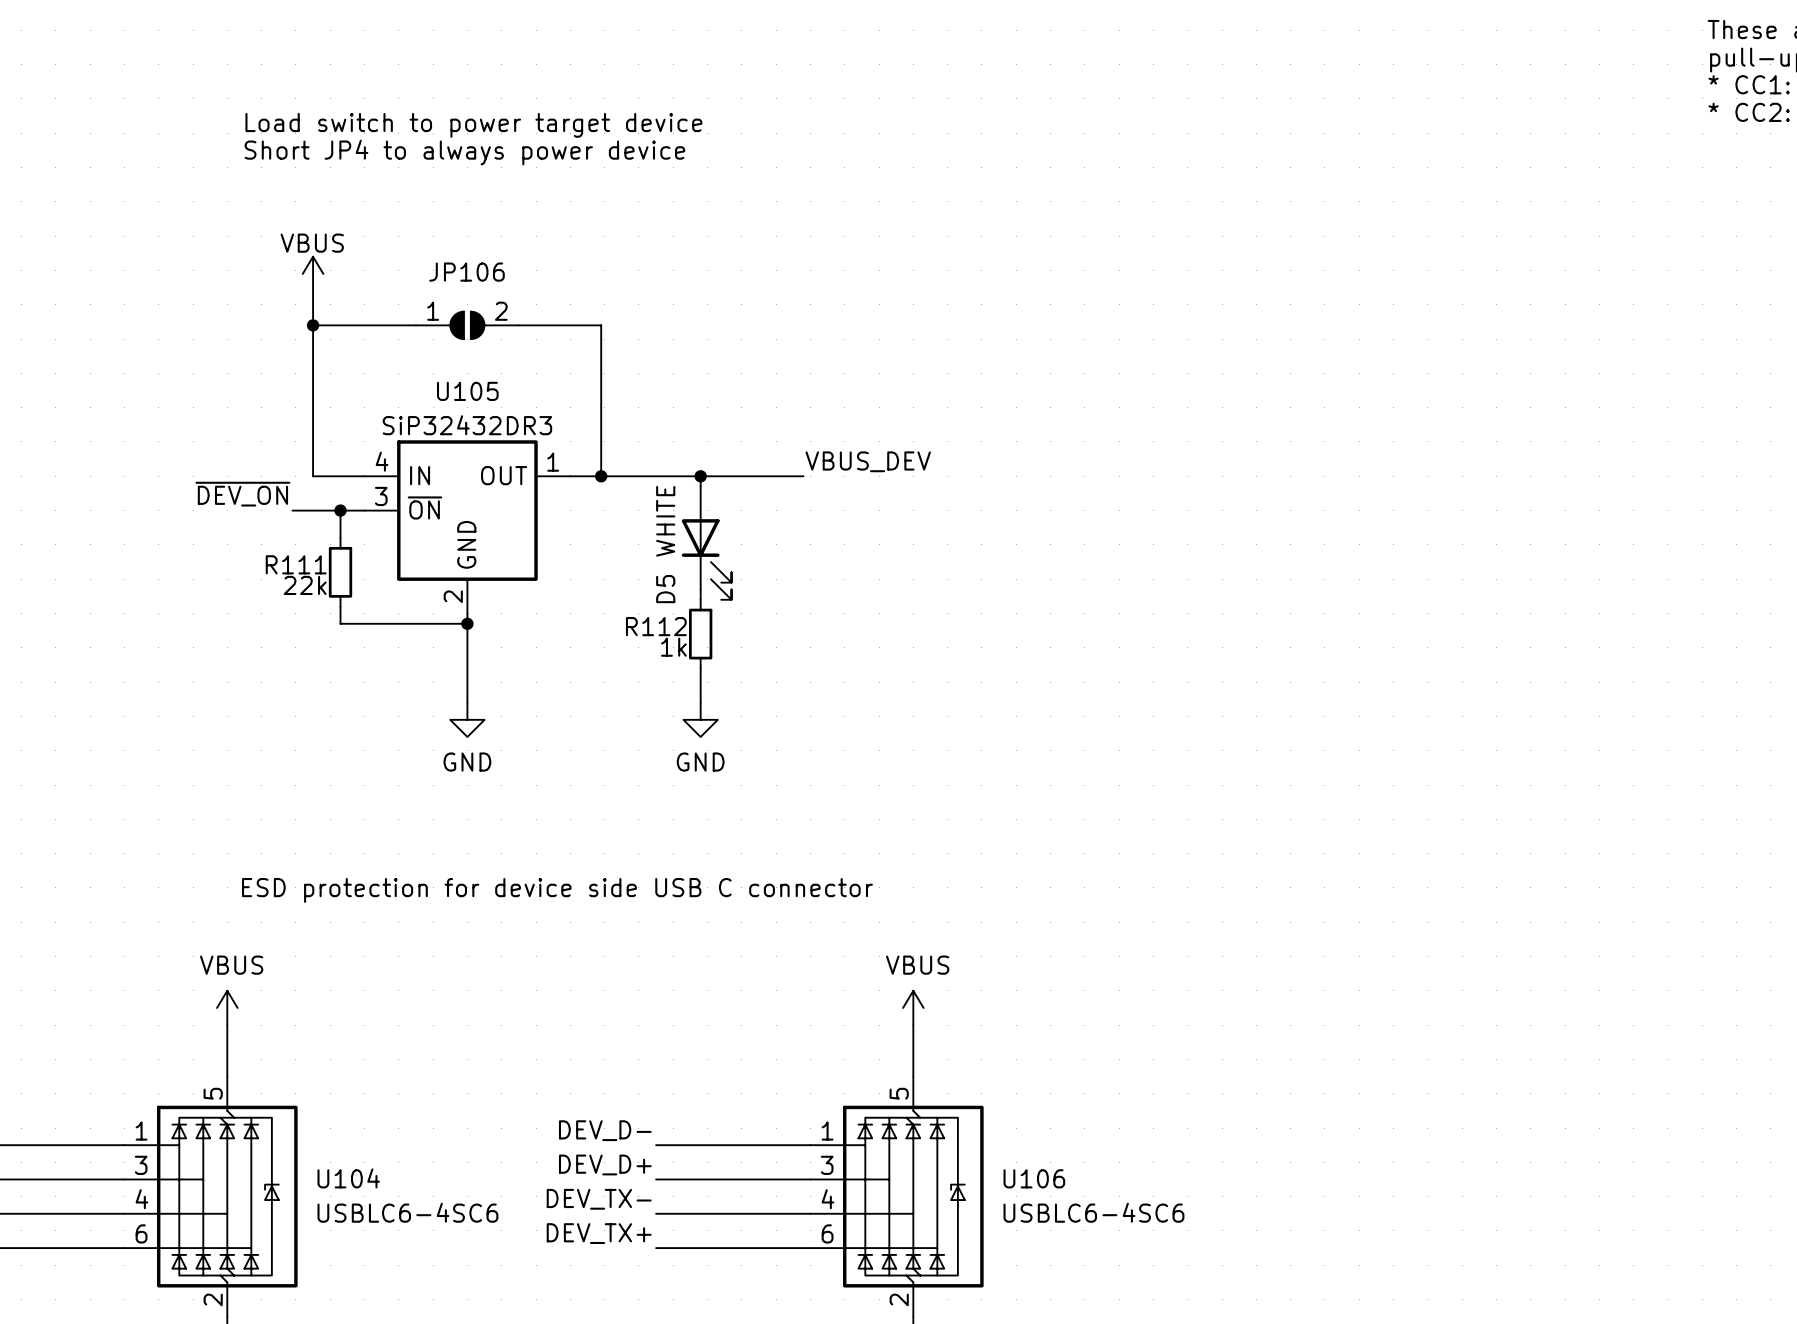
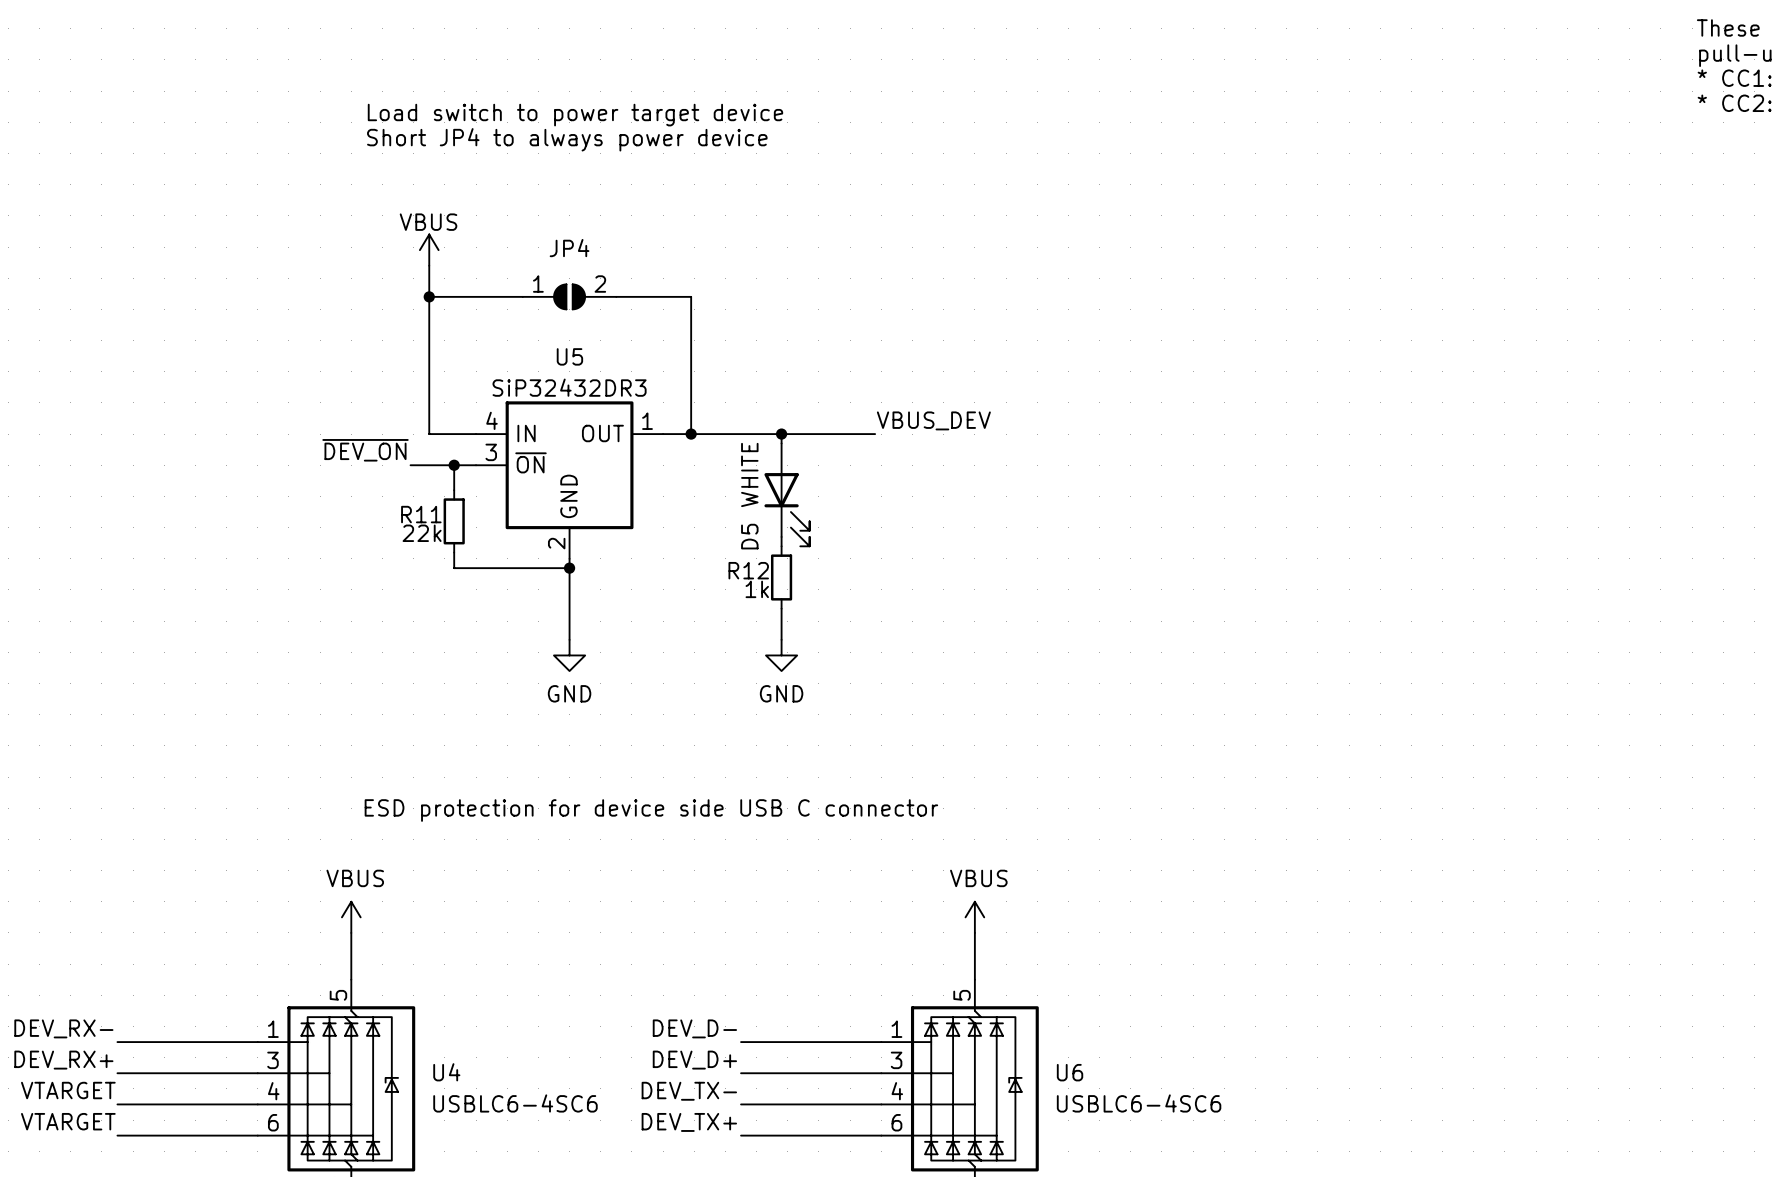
JP106 name: JP106 (467, 272) -> JP4 (569, 248)
U105 name: U105 (467, 391) -> U5 (569, 356)
R111 name: R111 (296, 564) -> R11 (421, 514)
R112 name: R112 (656, 626) -> R12 (748, 570)
U104 name: U104 (348, 1178) -> U4 (446, 1072)
U106 name: U106 (1034, 1178) -> U6 (1070, 1072)

